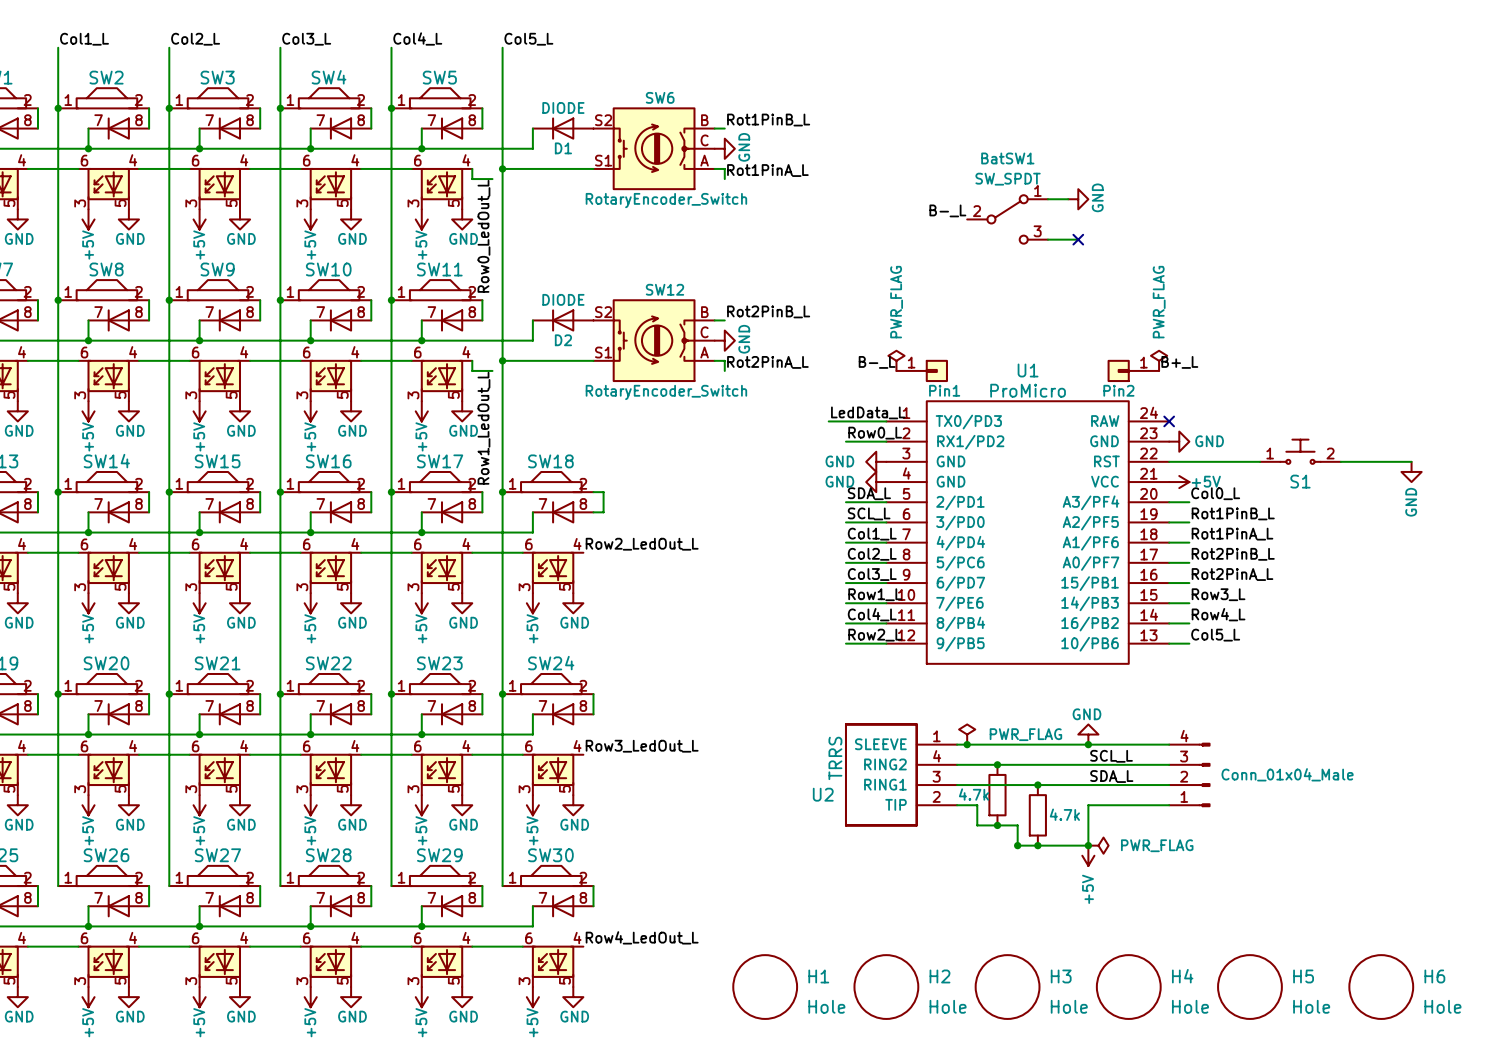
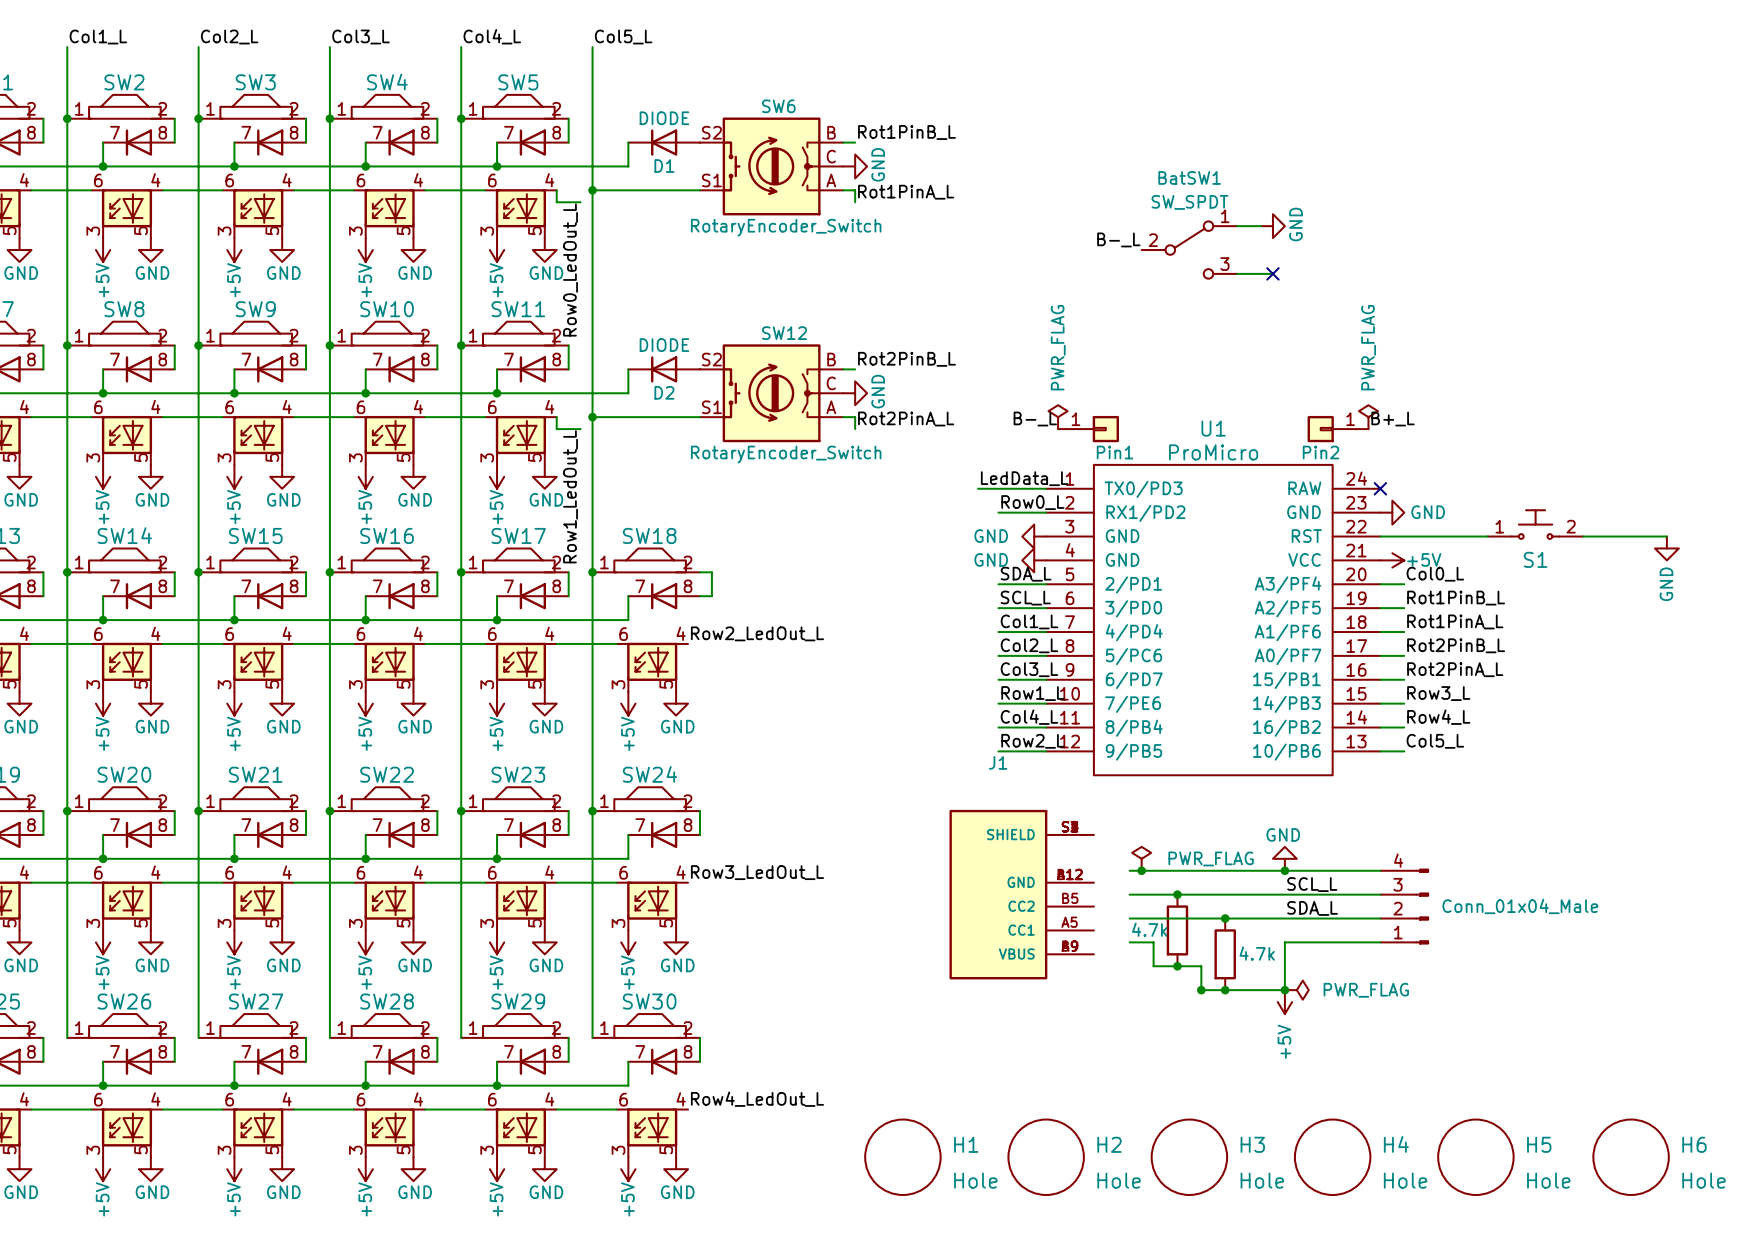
J1: none -> (1021, 894)
U2: TRRS (901, 774) -> none

